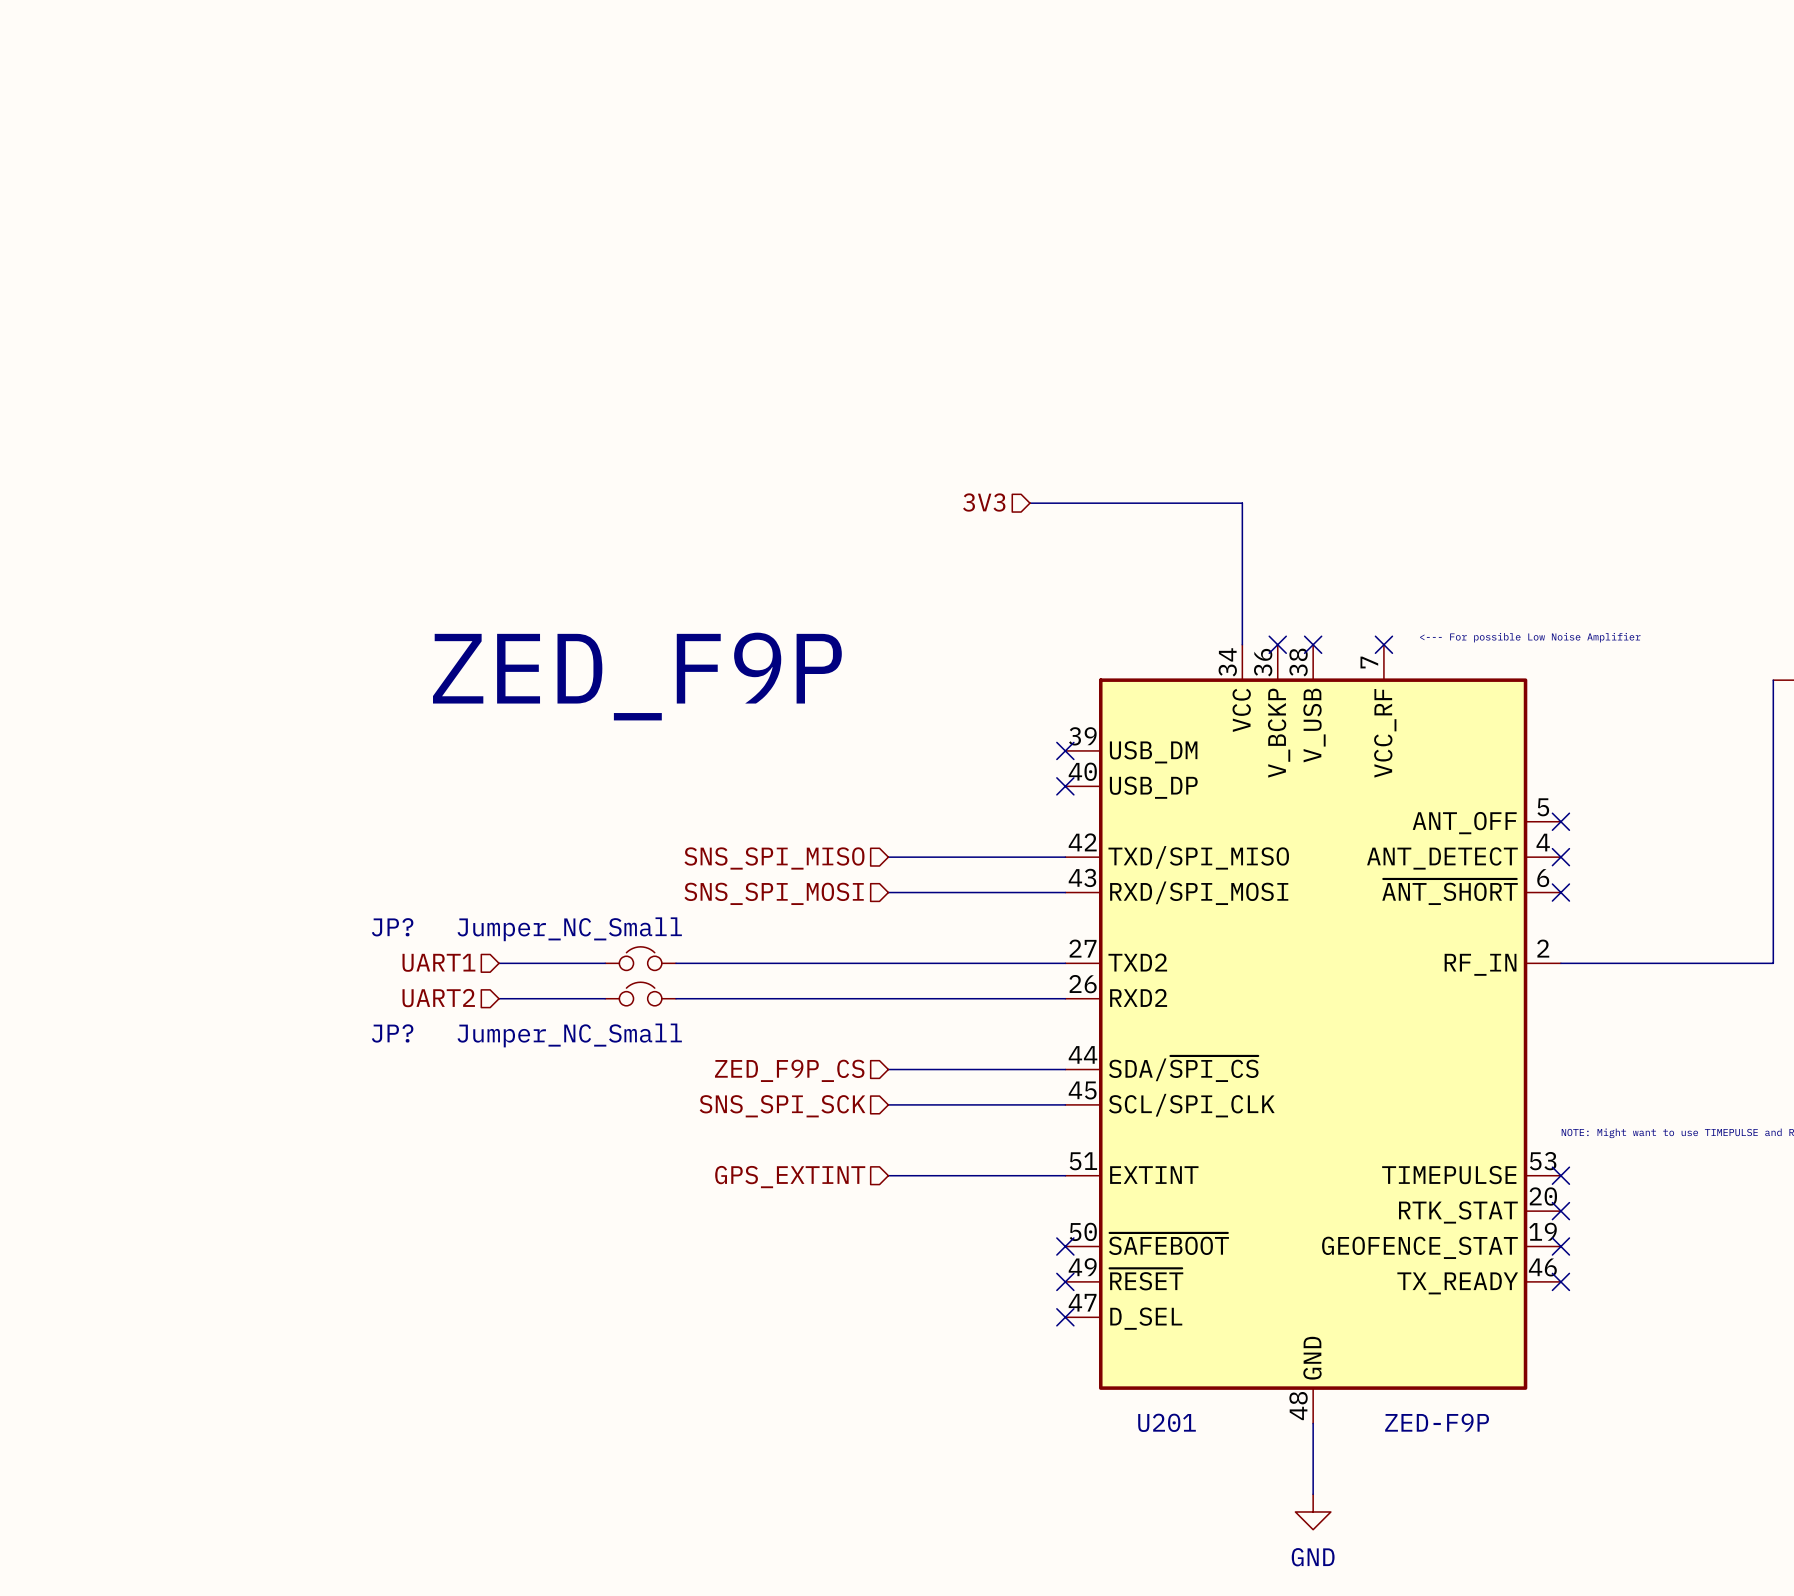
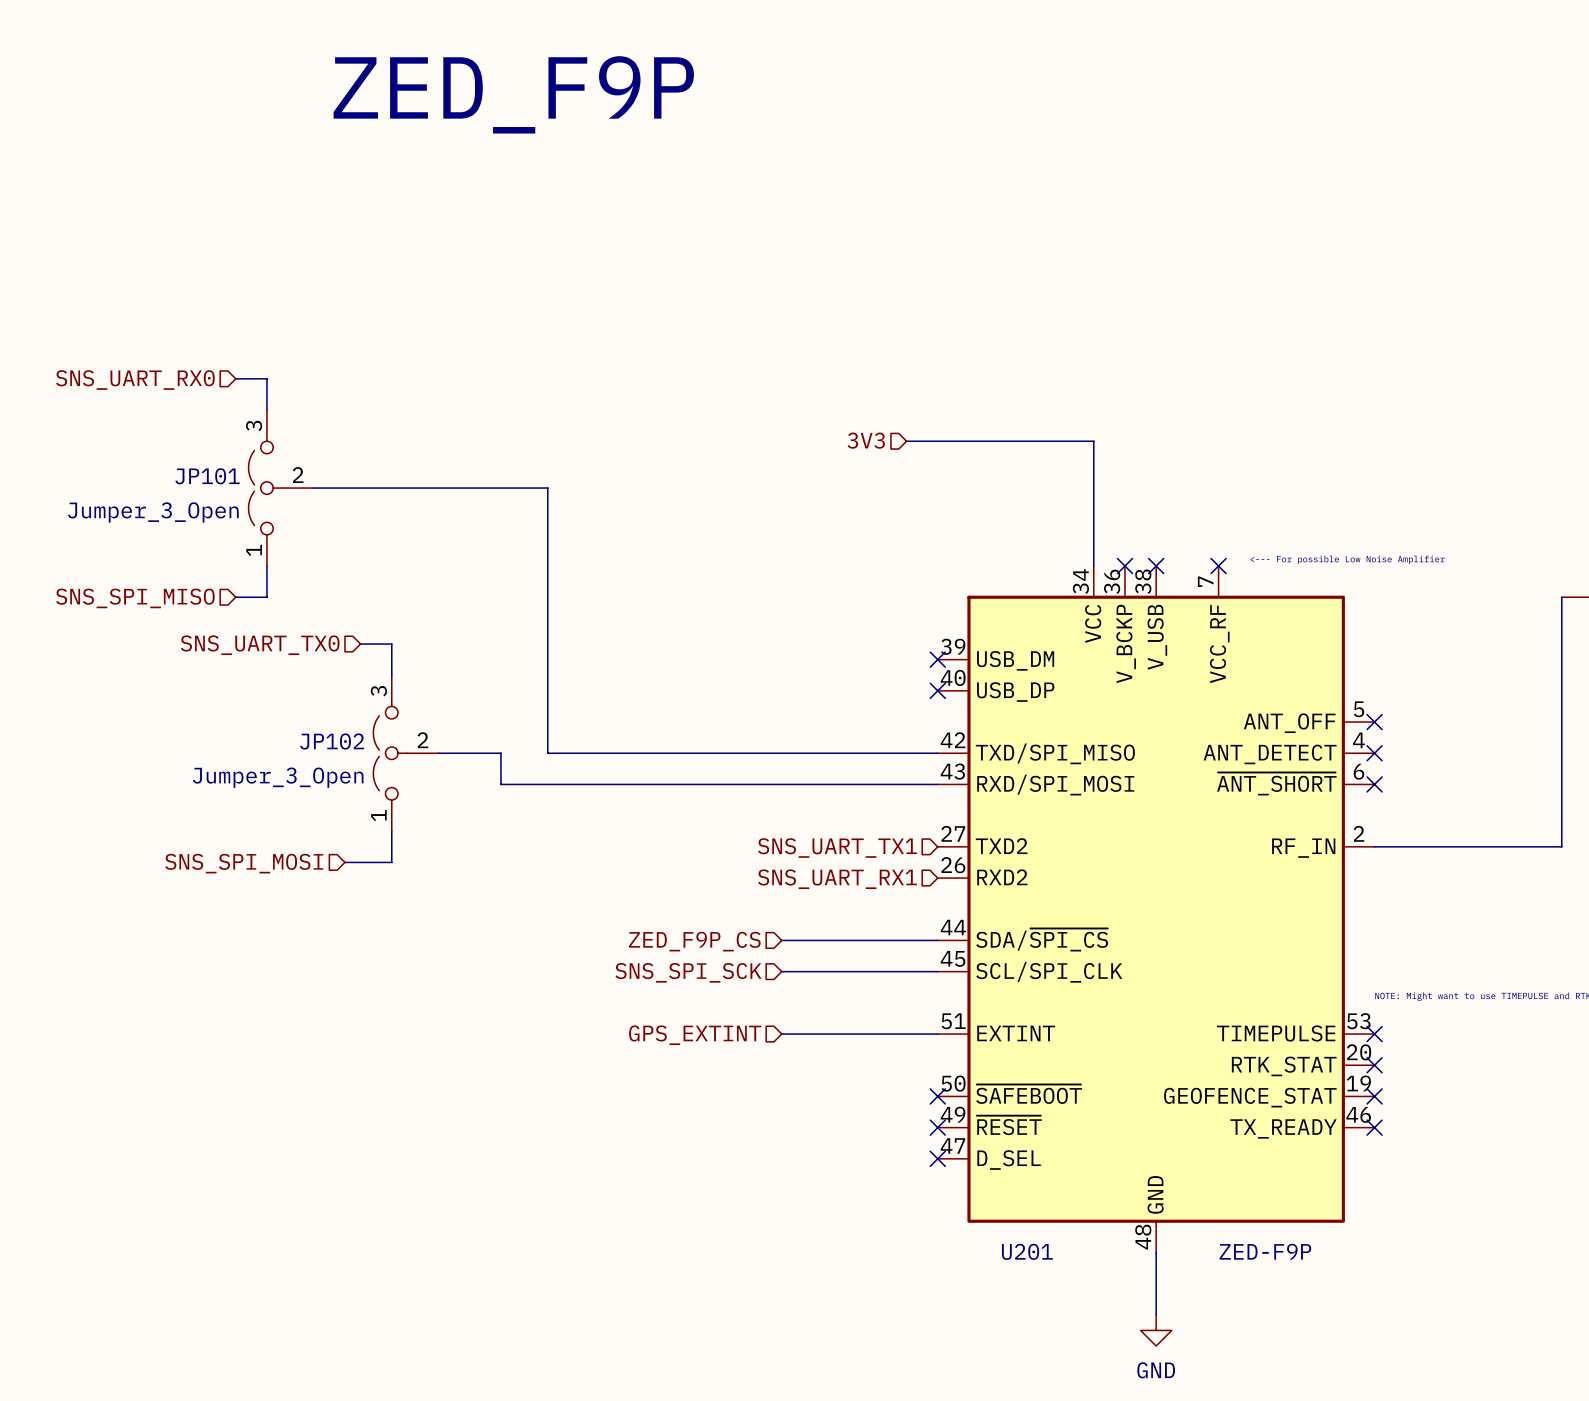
text: none -> ZED_F9P (513, 94)
wire: none -> (235, 378) (266, 378) (266, 410)
hierarchical label: none -> SNS_UART_RX0 (135, 380)
JP101: none -> Jumper_3_Open (281, 488)
wire: none -> (313, 488) (547, 488) (547, 753) (781, 753)
wire: none -> (266, 566) (266, 597) (235, 597)
text: ZED_F9P (637, 676) -> none
hierarchical label: none -> SNS_SPI_MISO (135, 598)
wire: none -> (360, 644) (391, 644) (391, 675)
hierarchical label: none -> SNS_UART_TX0 (260, 645)
JP102: none -> Jumper_3_Open (405, 753)
wire: none -> (438, 753) (500, 753) (500, 784) (781, 784)
hierarchical label: SNS_SPI_MISO (774, 858) -> none
hierarchical label: SNS_SPI_MOSI (774, 893) -> none
wire: none -> (391, 831) (391, 862) (344, 862)
JP?: Jumper_NC_Small (640, 958) -> none
hierarchical label: UART1 (438, 962) -> none
wire: (499, 963) (605, 963) -> none
wire: (675, 963) (1065, 963) -> none
hierarchical label: none -> SNS_UART_TX1 (837, 848)
hierarchical label: none -> SNS_SPI_MOSI (244, 863)
JP?: Jumper_NC_Small (640, 994) -> none
hierarchical label: UART2 (438, 998) -> none
wire: (499, 998) (605, 998) -> none
wire: (675, 998) (1065, 998) -> none
hierarchical label: none -> SNS_UART_RX1 (837, 879)

